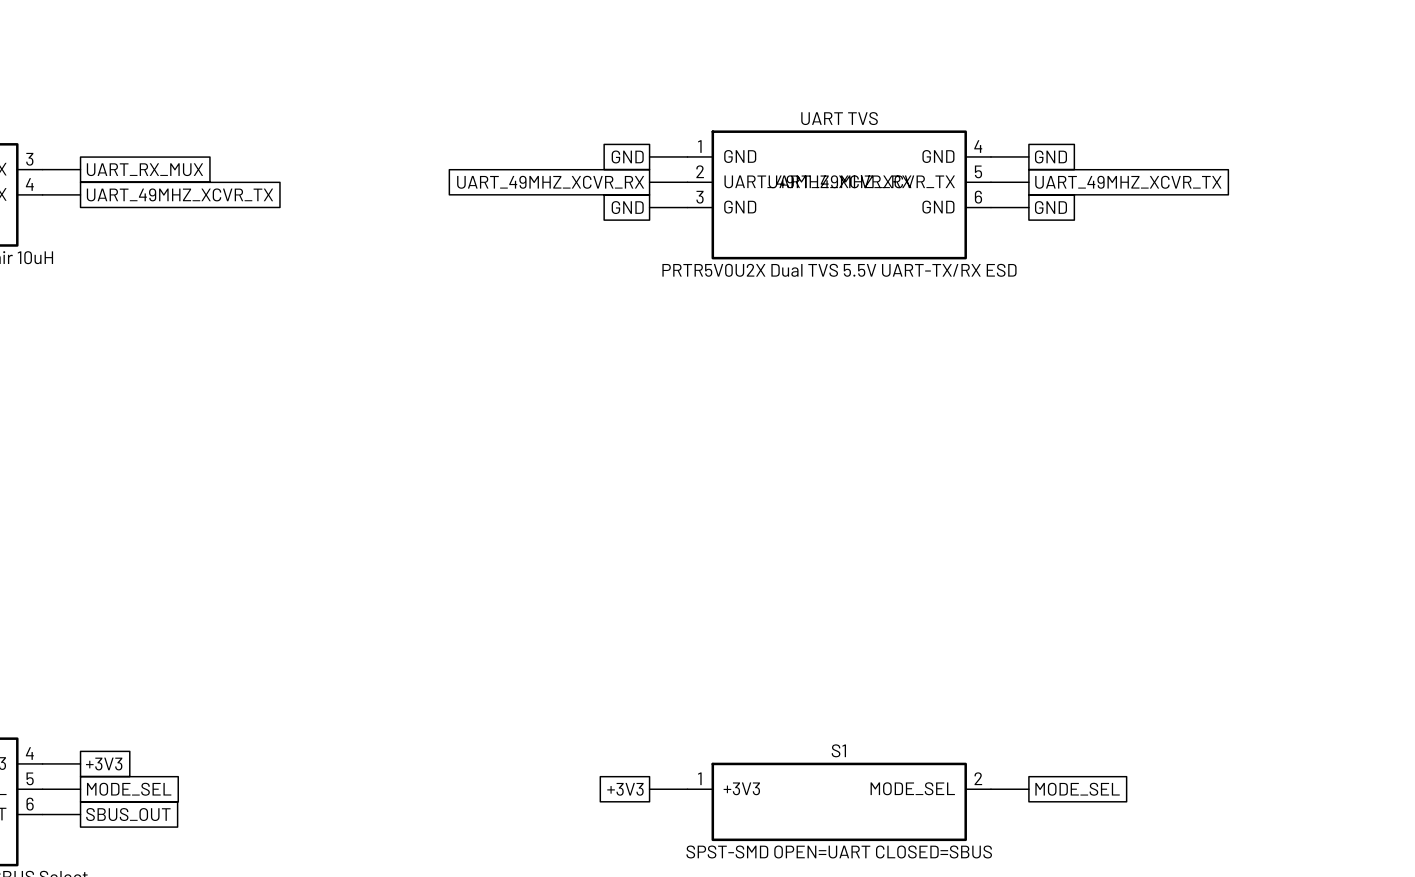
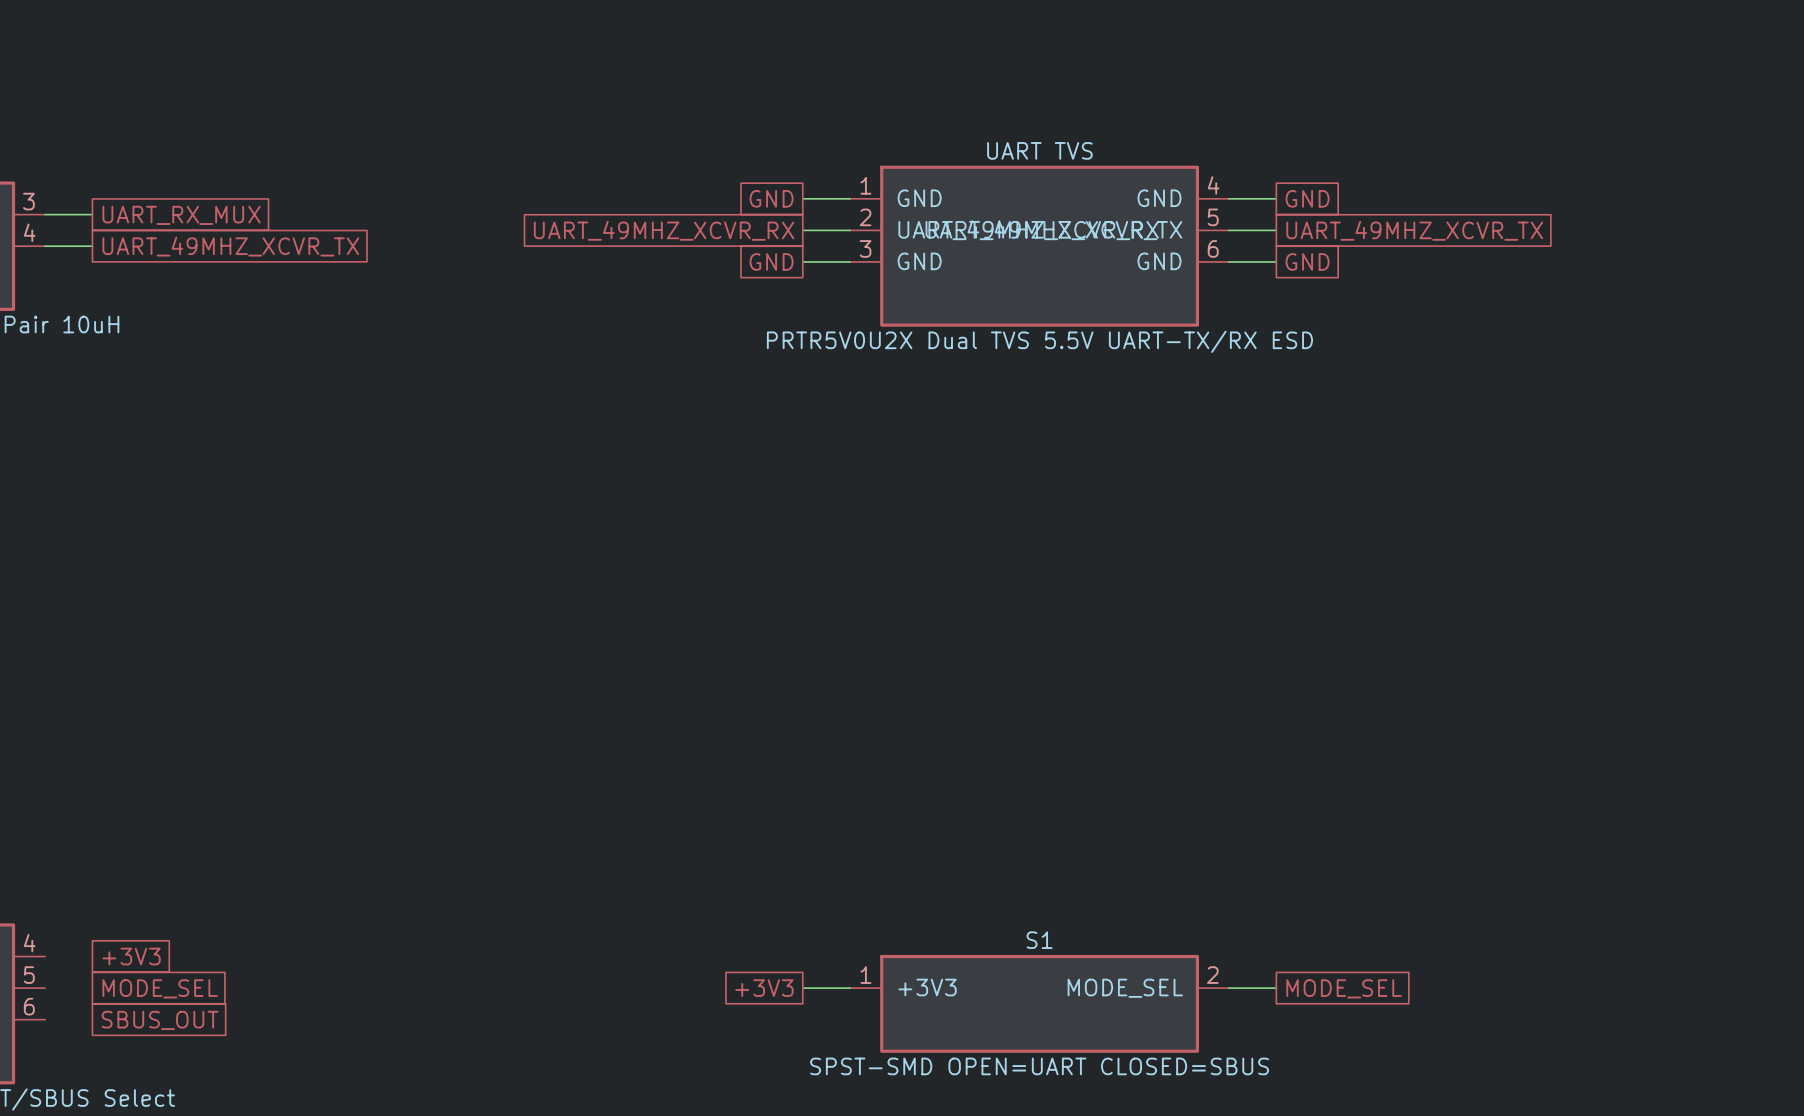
wire: (42, 763) (80, 763) -> none
wire: (42, 789) (80, 789) -> none
wire: (42, 814) (80, 814) -> none

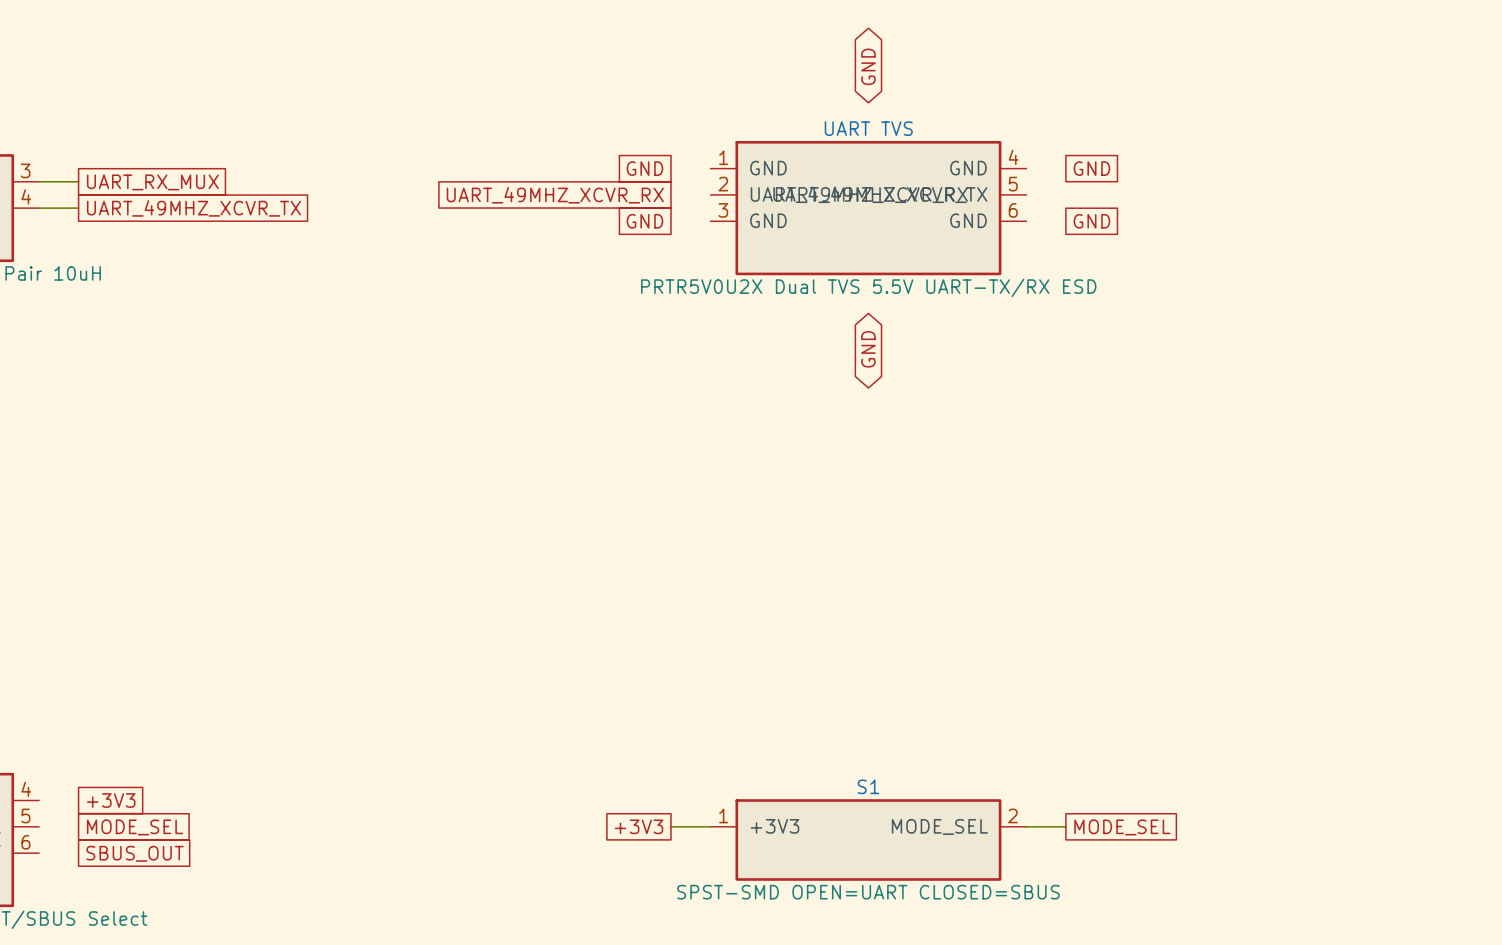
global label: none -> GND (868, 66)
wire: (802, 198) (850, 198) -> none
wire: (1228, 198) (1276, 198) -> none
wire: (802, 230) (850, 230) -> none
wire: (1228, 230) (1276, 230) -> none
global label: UART_49MHZ_XCVR_TX (1414, 230) -> none
wire: (802, 261) (850, 261) -> none
wire: (1228, 261) (1276, 261) -> none
global label: none -> GND (868, 349)

